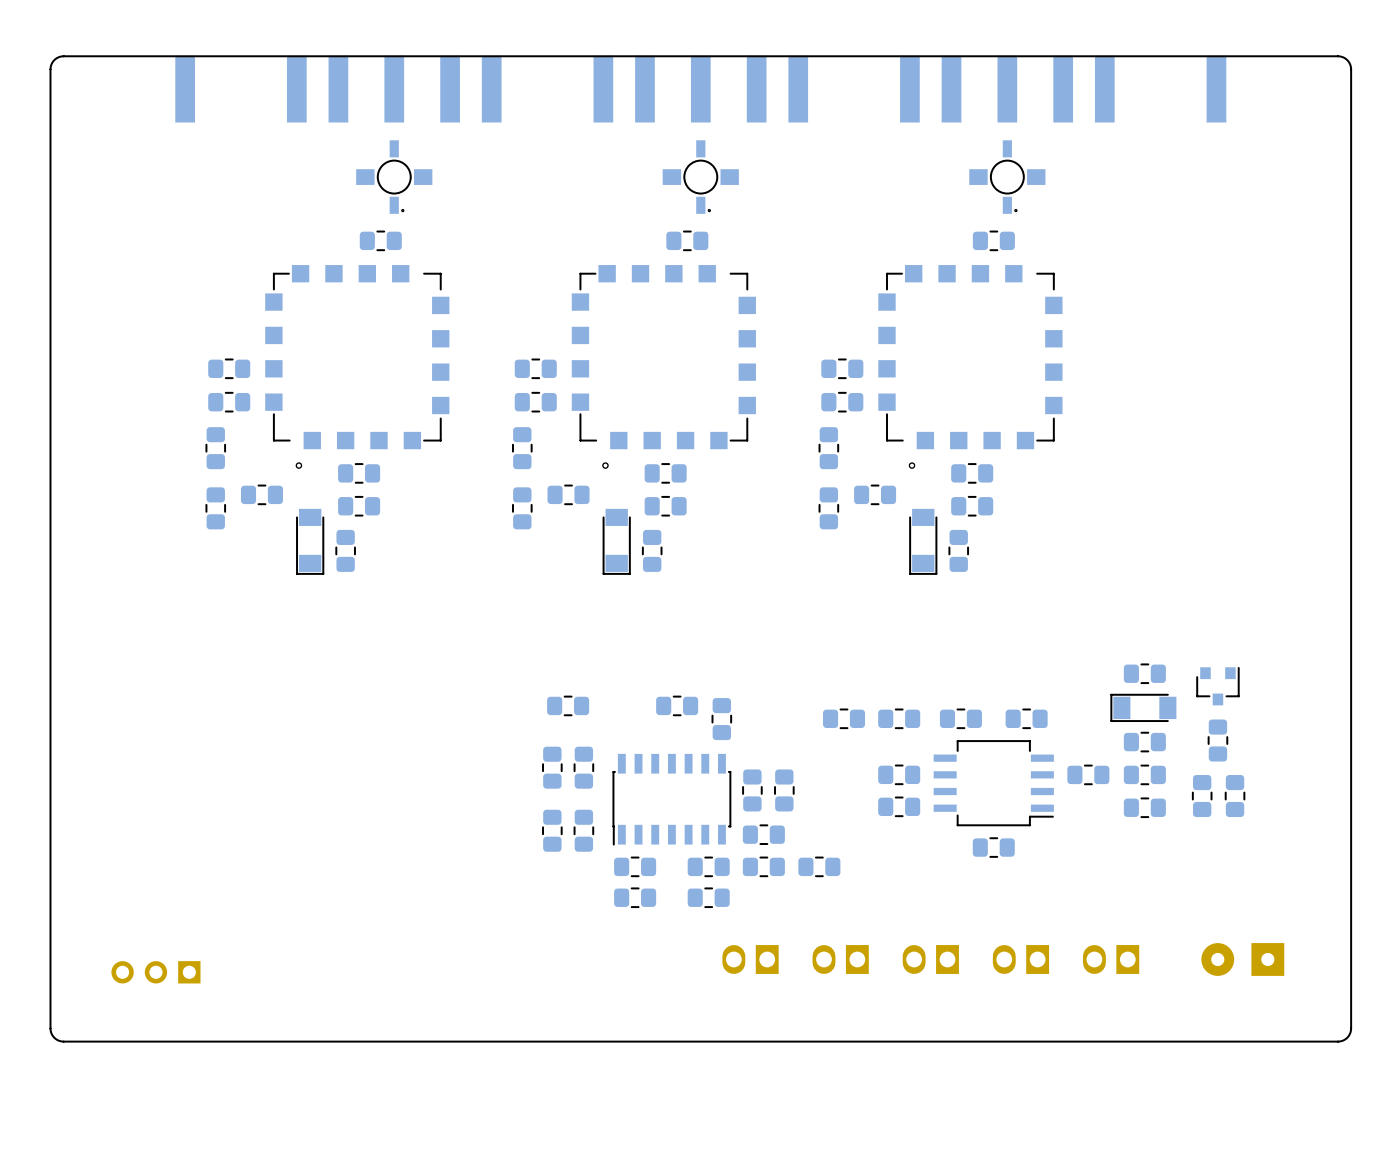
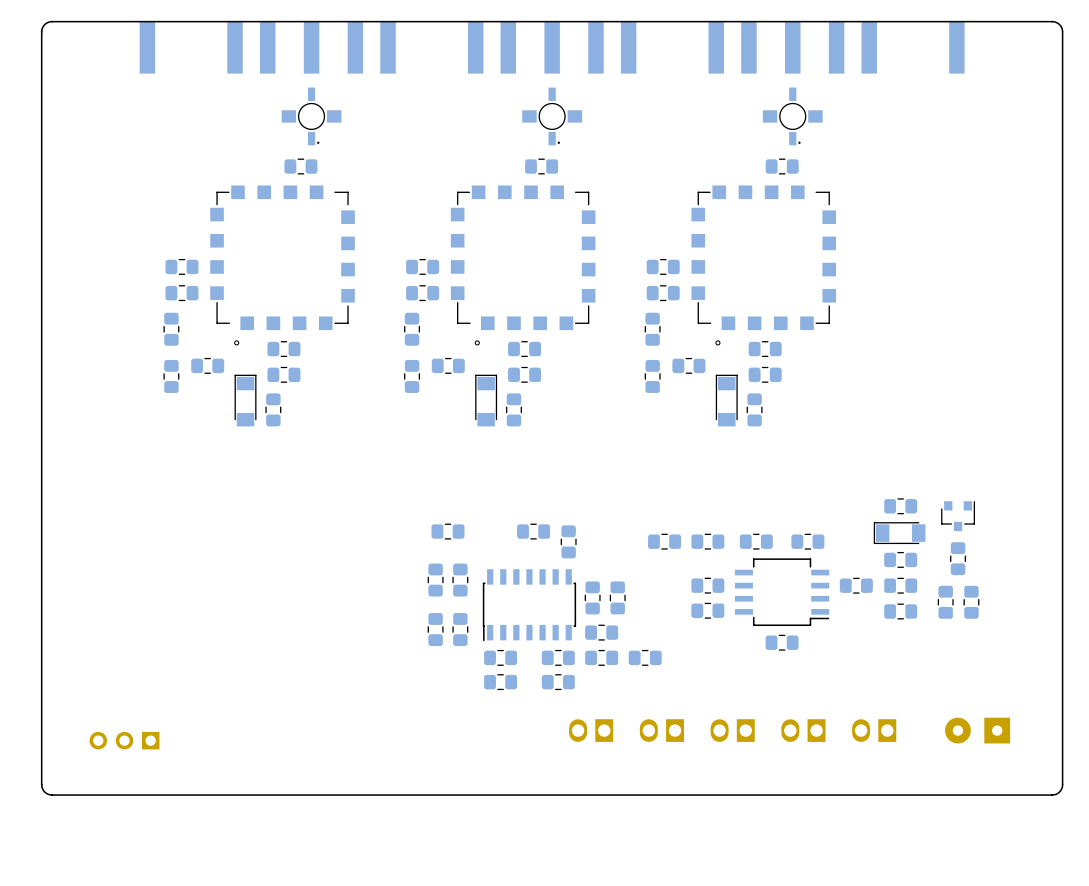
part rotation: 0° (310, 541) -> 180° (245, 400)
part rotation: 0° (616, 541) -> 180° (486, 400)
part rotation: 0° (923, 541) -> 180° (726, 400)

